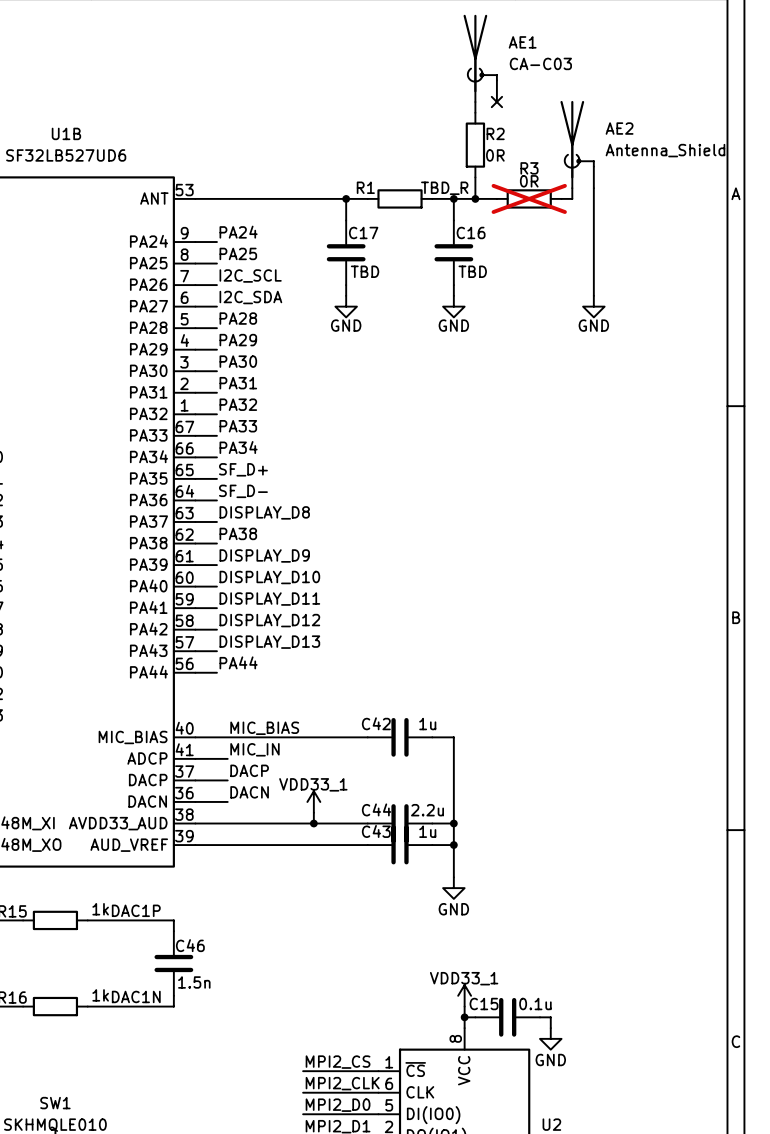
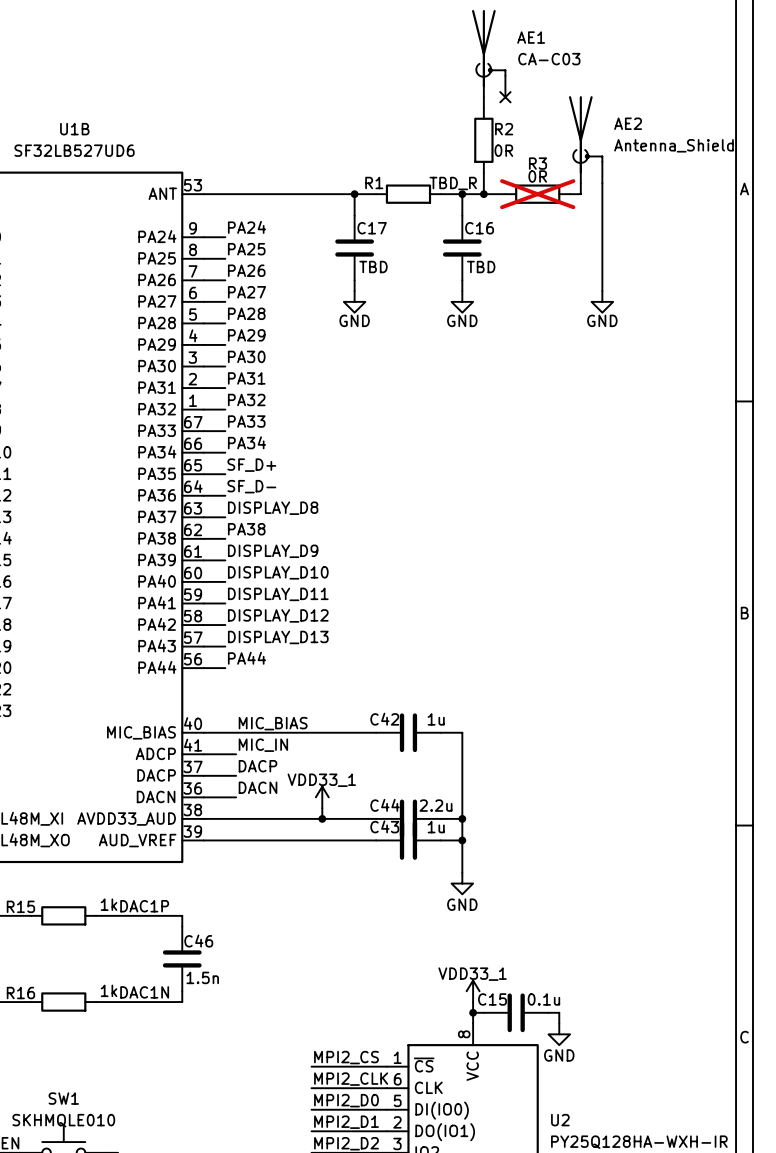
label: I2C_SCL (250, 275) -> PA26 (246, 270)
label: I2C_SDA (250, 297) -> PA27 (246, 292)

